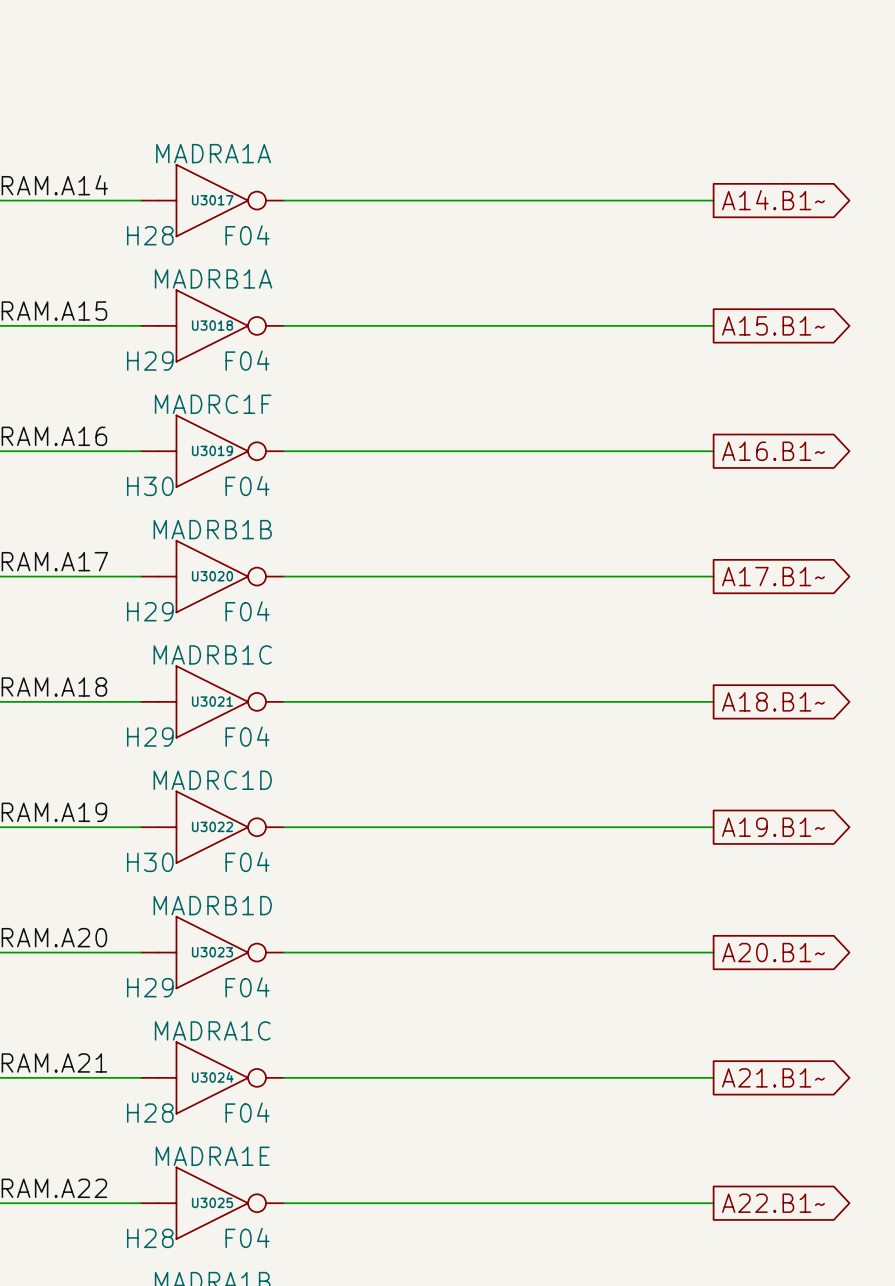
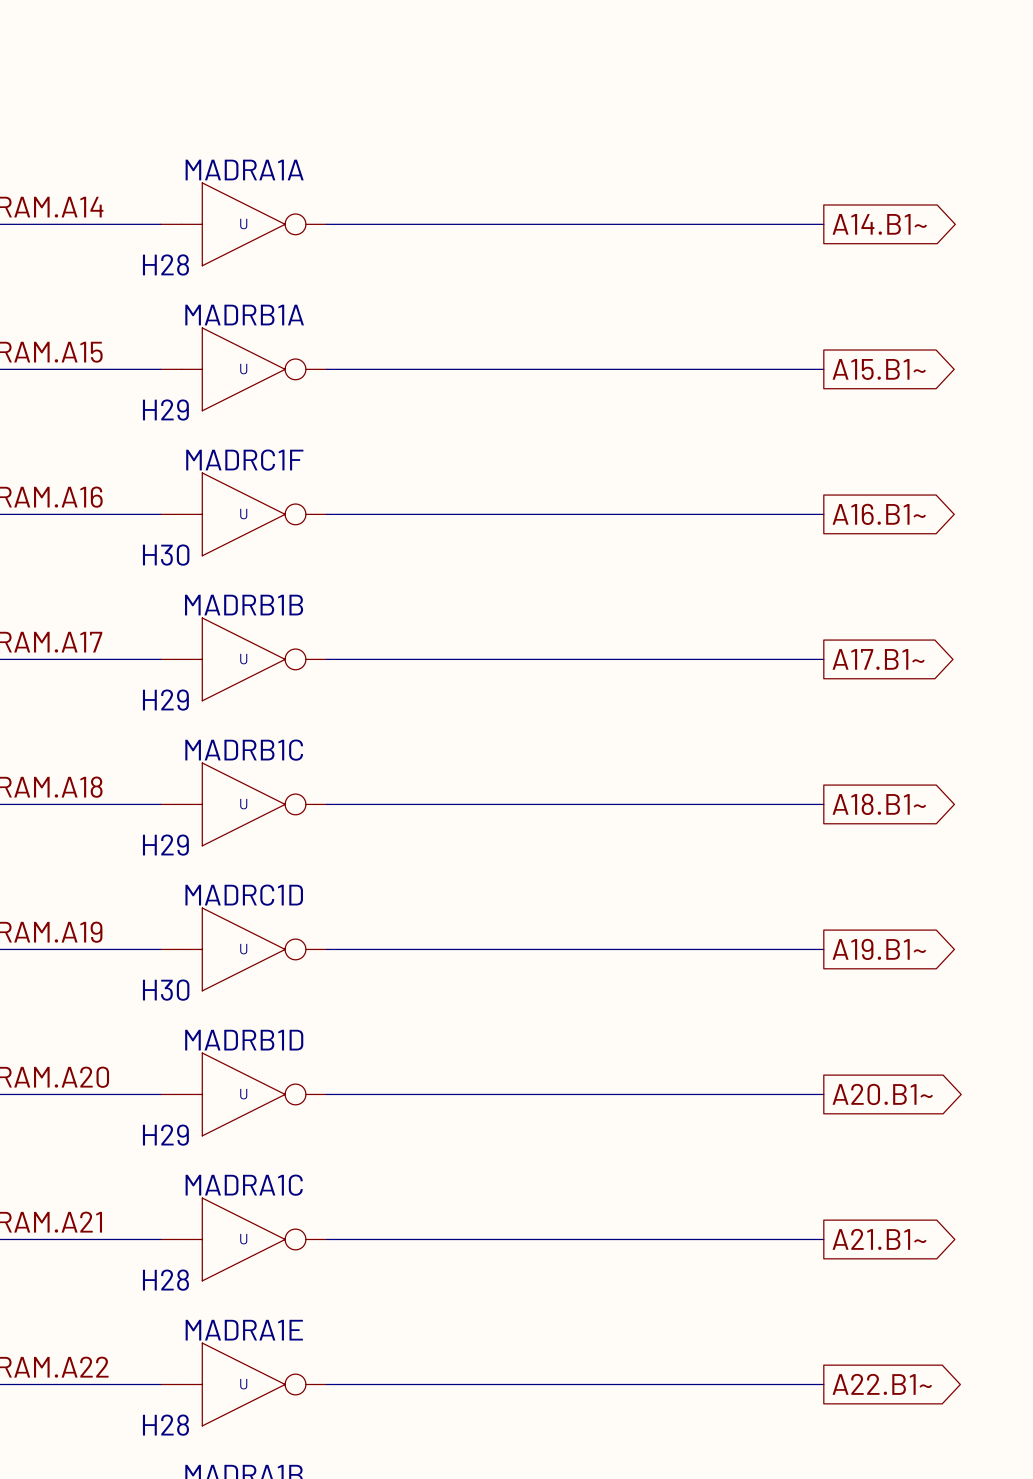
U3017 name: U3017 (212, 200) -> U (243, 224)
U3017 value: F04 (247, 235) -> none
U3018 name: U3018 (212, 325) -> U (243, 369)
U3018 value: F04 (247, 360) -> none
U3019 name: U3019 (212, 450) -> U (243, 514)
U3019 value: F04 (247, 485) -> none
U3020 name: U3020 (212, 576) -> U (243, 659)
U3020 value: F04 (247, 611) -> none
U3021 name: U3021 (212, 701) -> U (243, 804)
U3021 value: F04 (247, 736) -> none
U3022 name: U3022 (212, 826) -> U (243, 949)
U3022 value: F04 (247, 861) -> none
U3023 name: U3023 (212, 952) -> U (243, 1094)
U3023 value: F04 (247, 987) -> none
U3024 name: U3024 (212, 1077) -> U (243, 1239)
U3024 value: F04 (247, 1112) -> none
U3025 name: U3025 (212, 1202) -> U (243, 1384)
U3025 value: F04 (247, 1237) -> none

